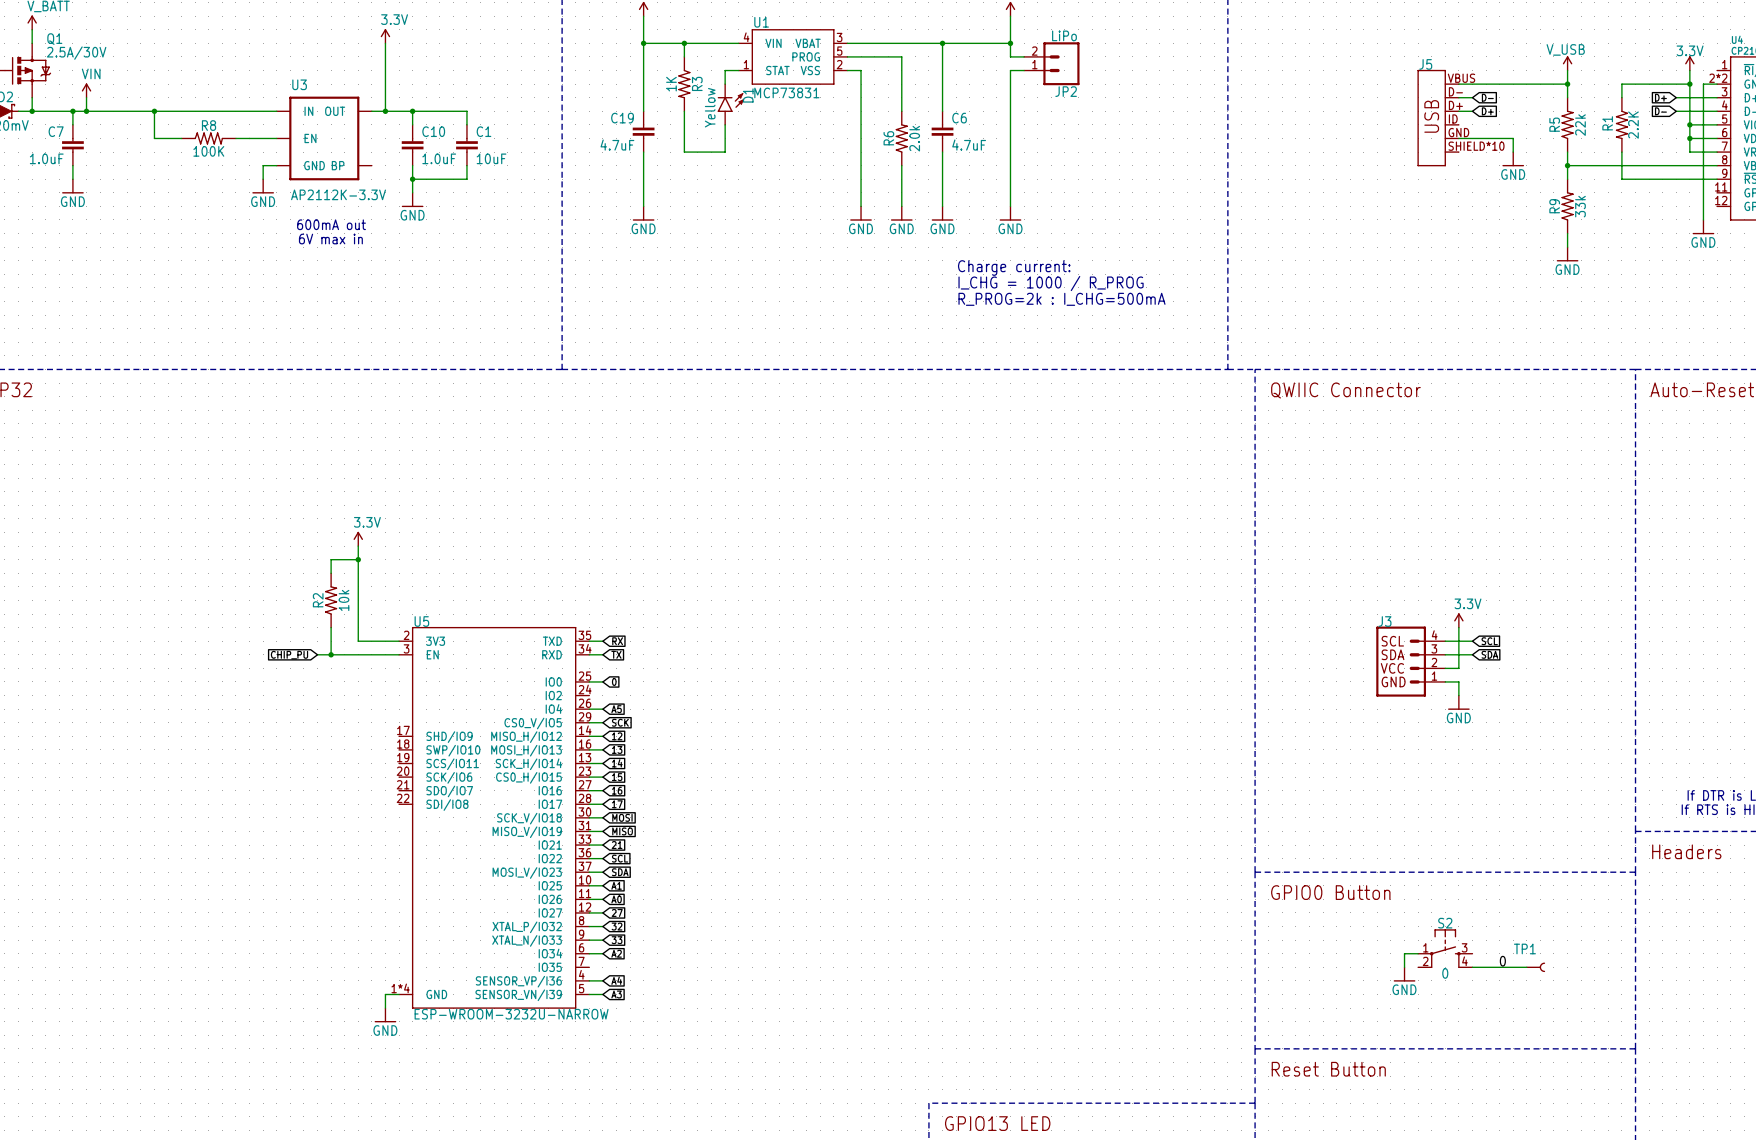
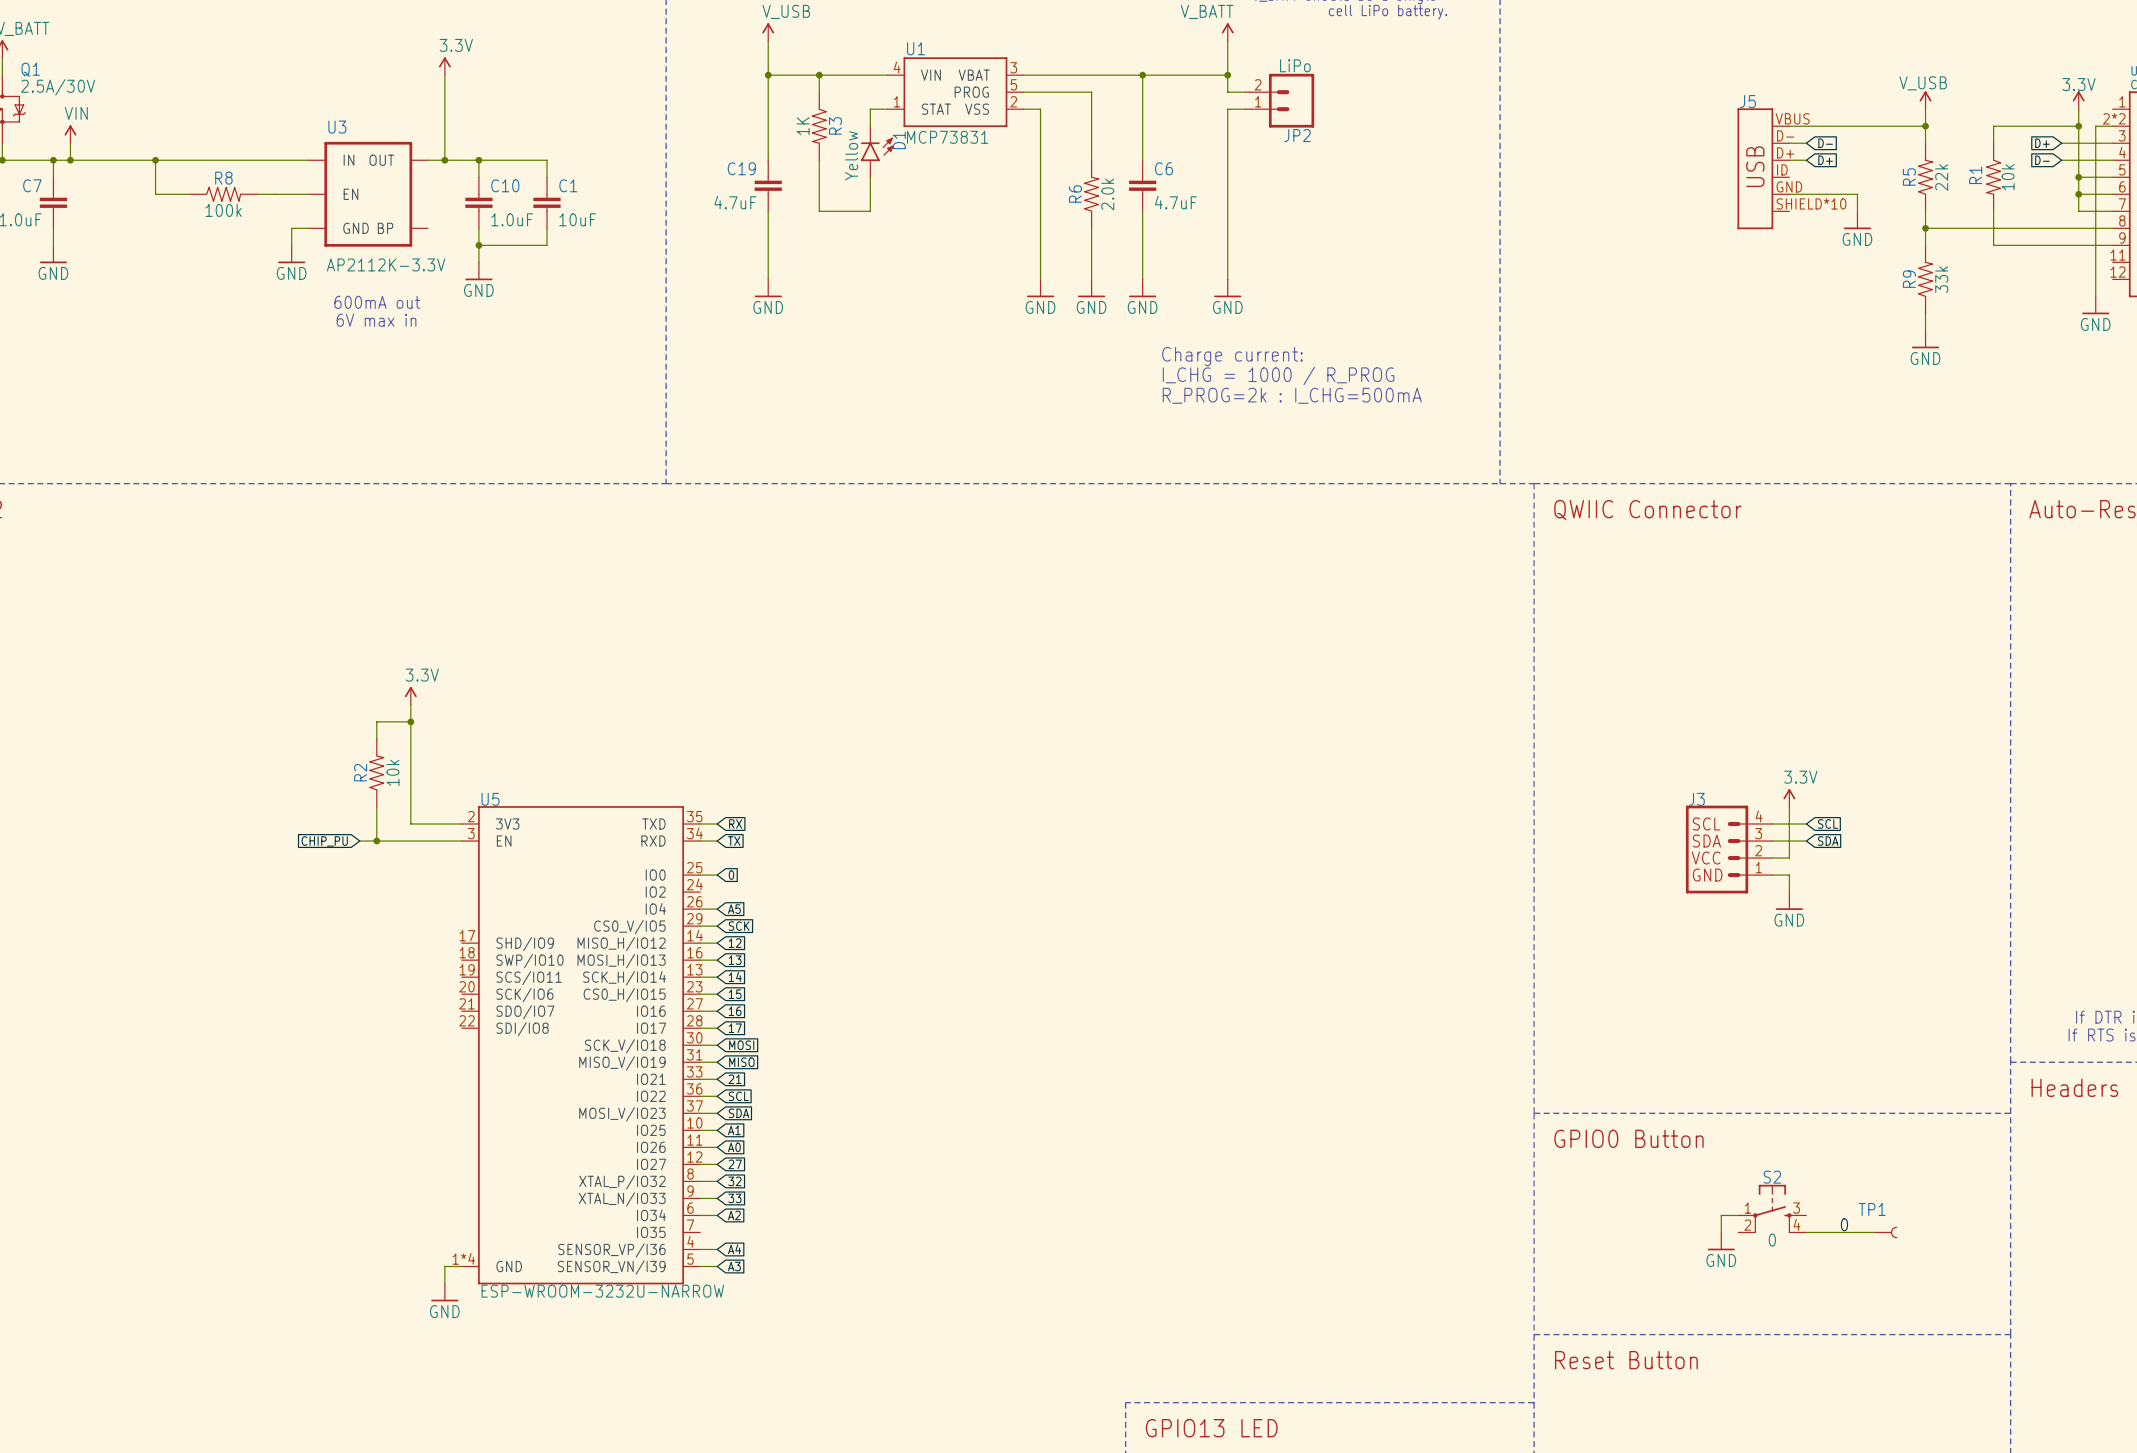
R1 value: 2.2K (1633, 125) -> 10k (2008, 177)
R8 value: 100K (208, 151) -> 100k (223, 210)

